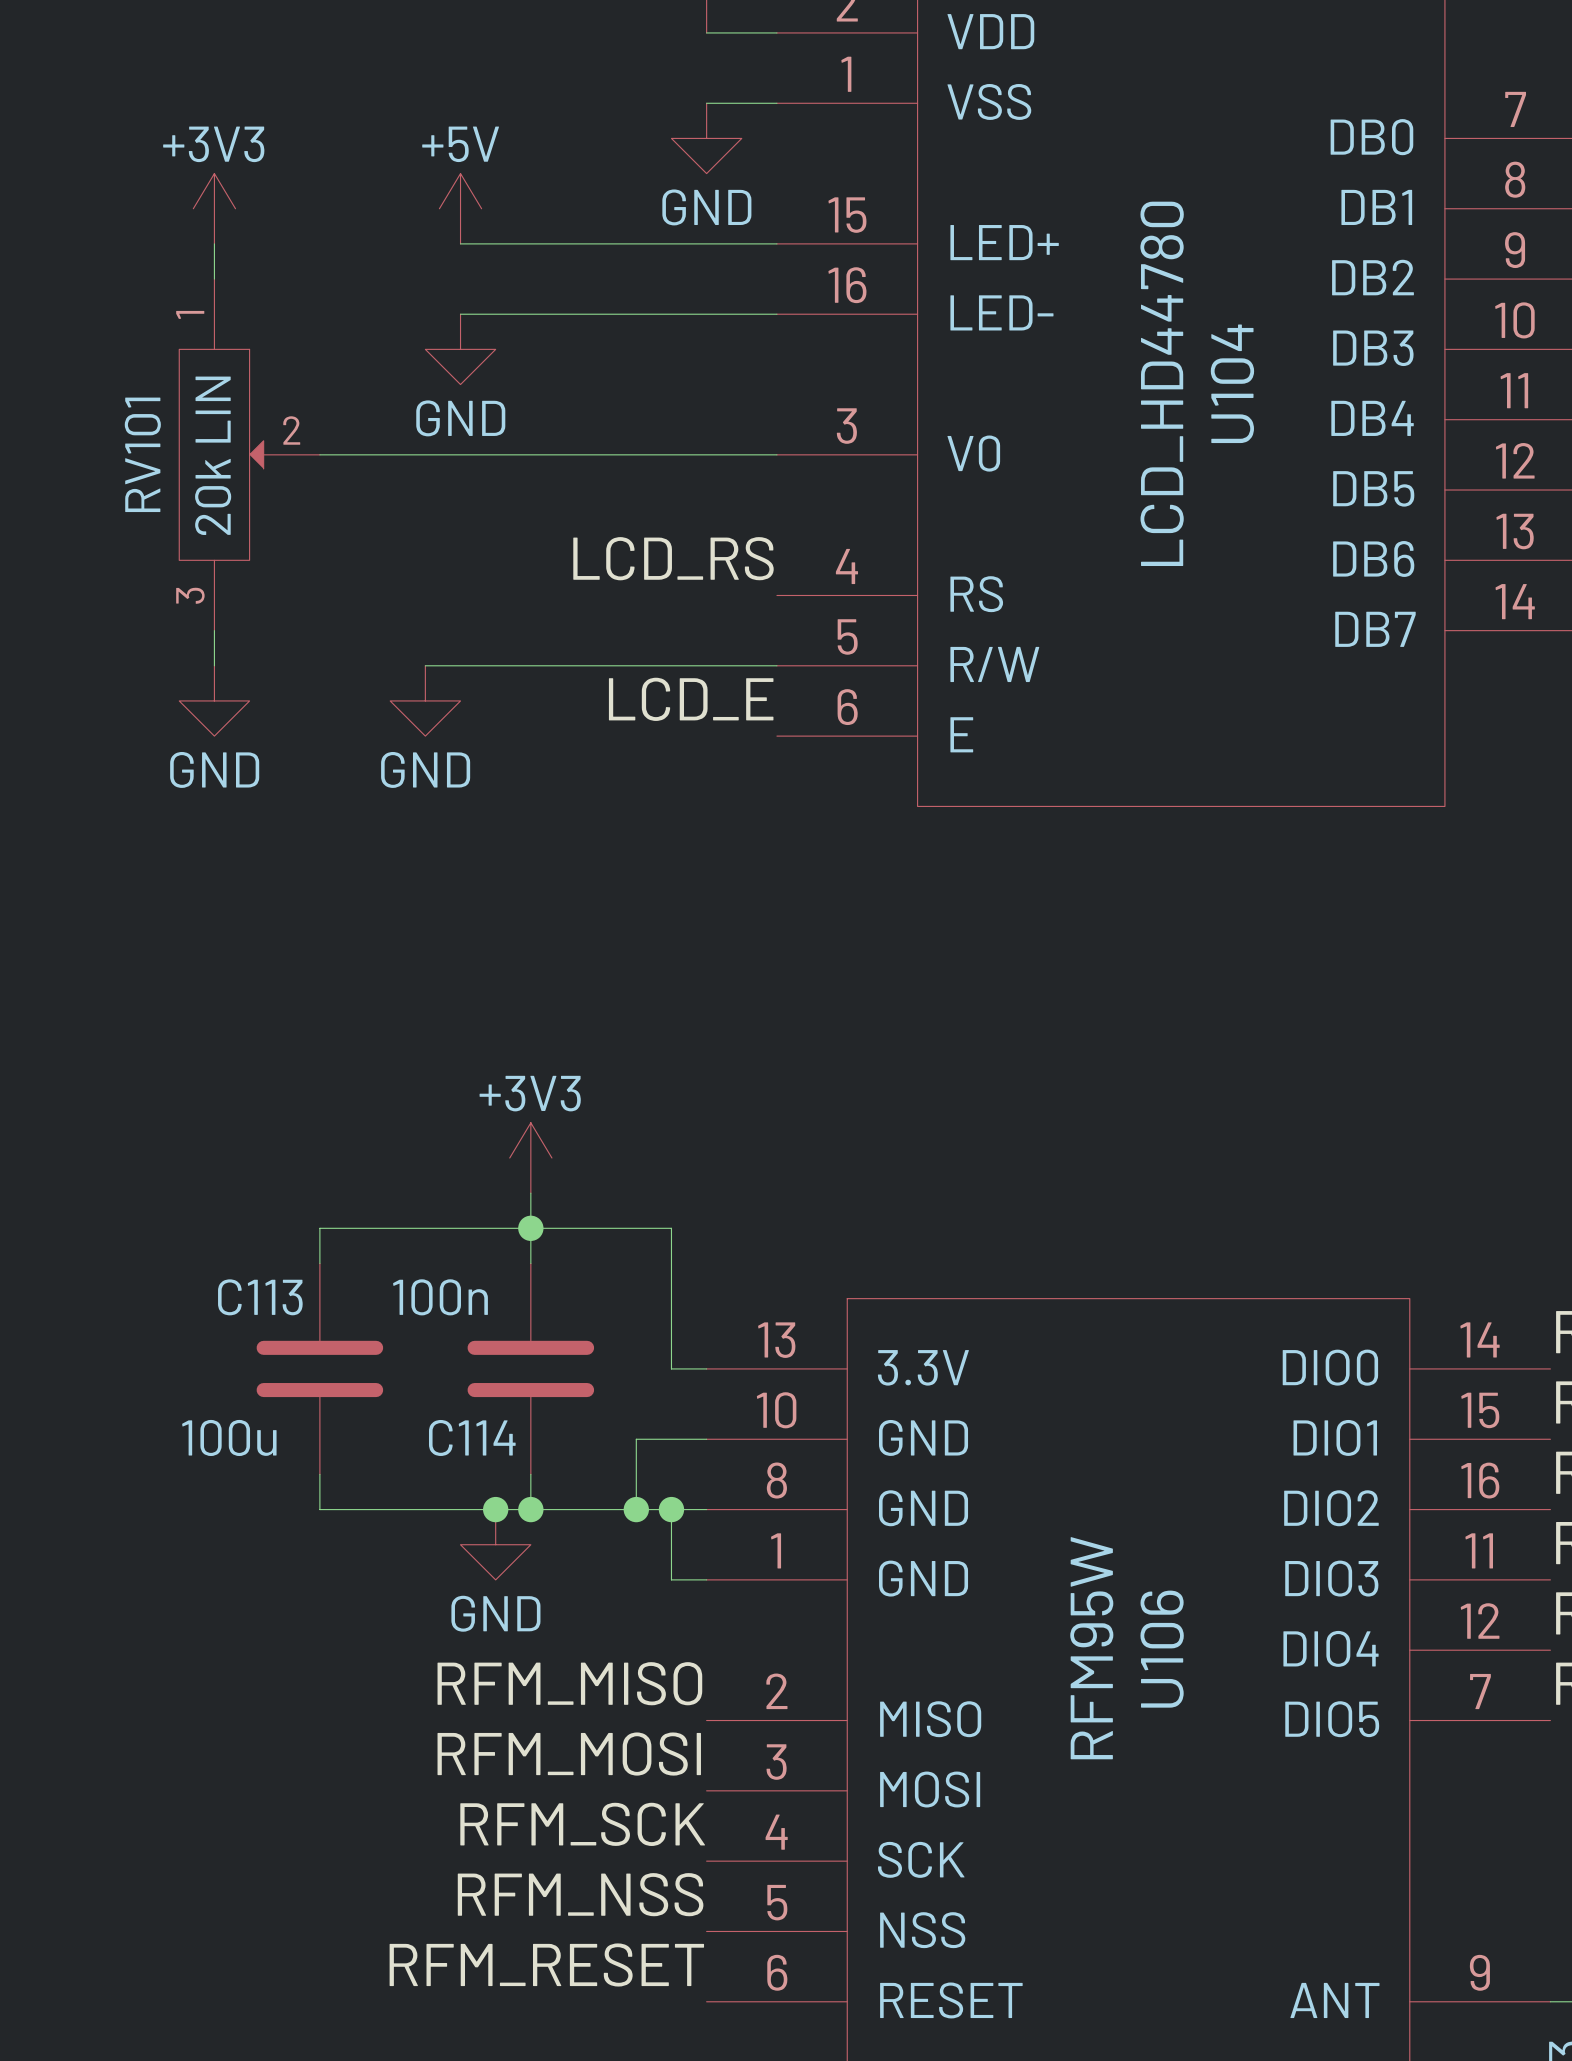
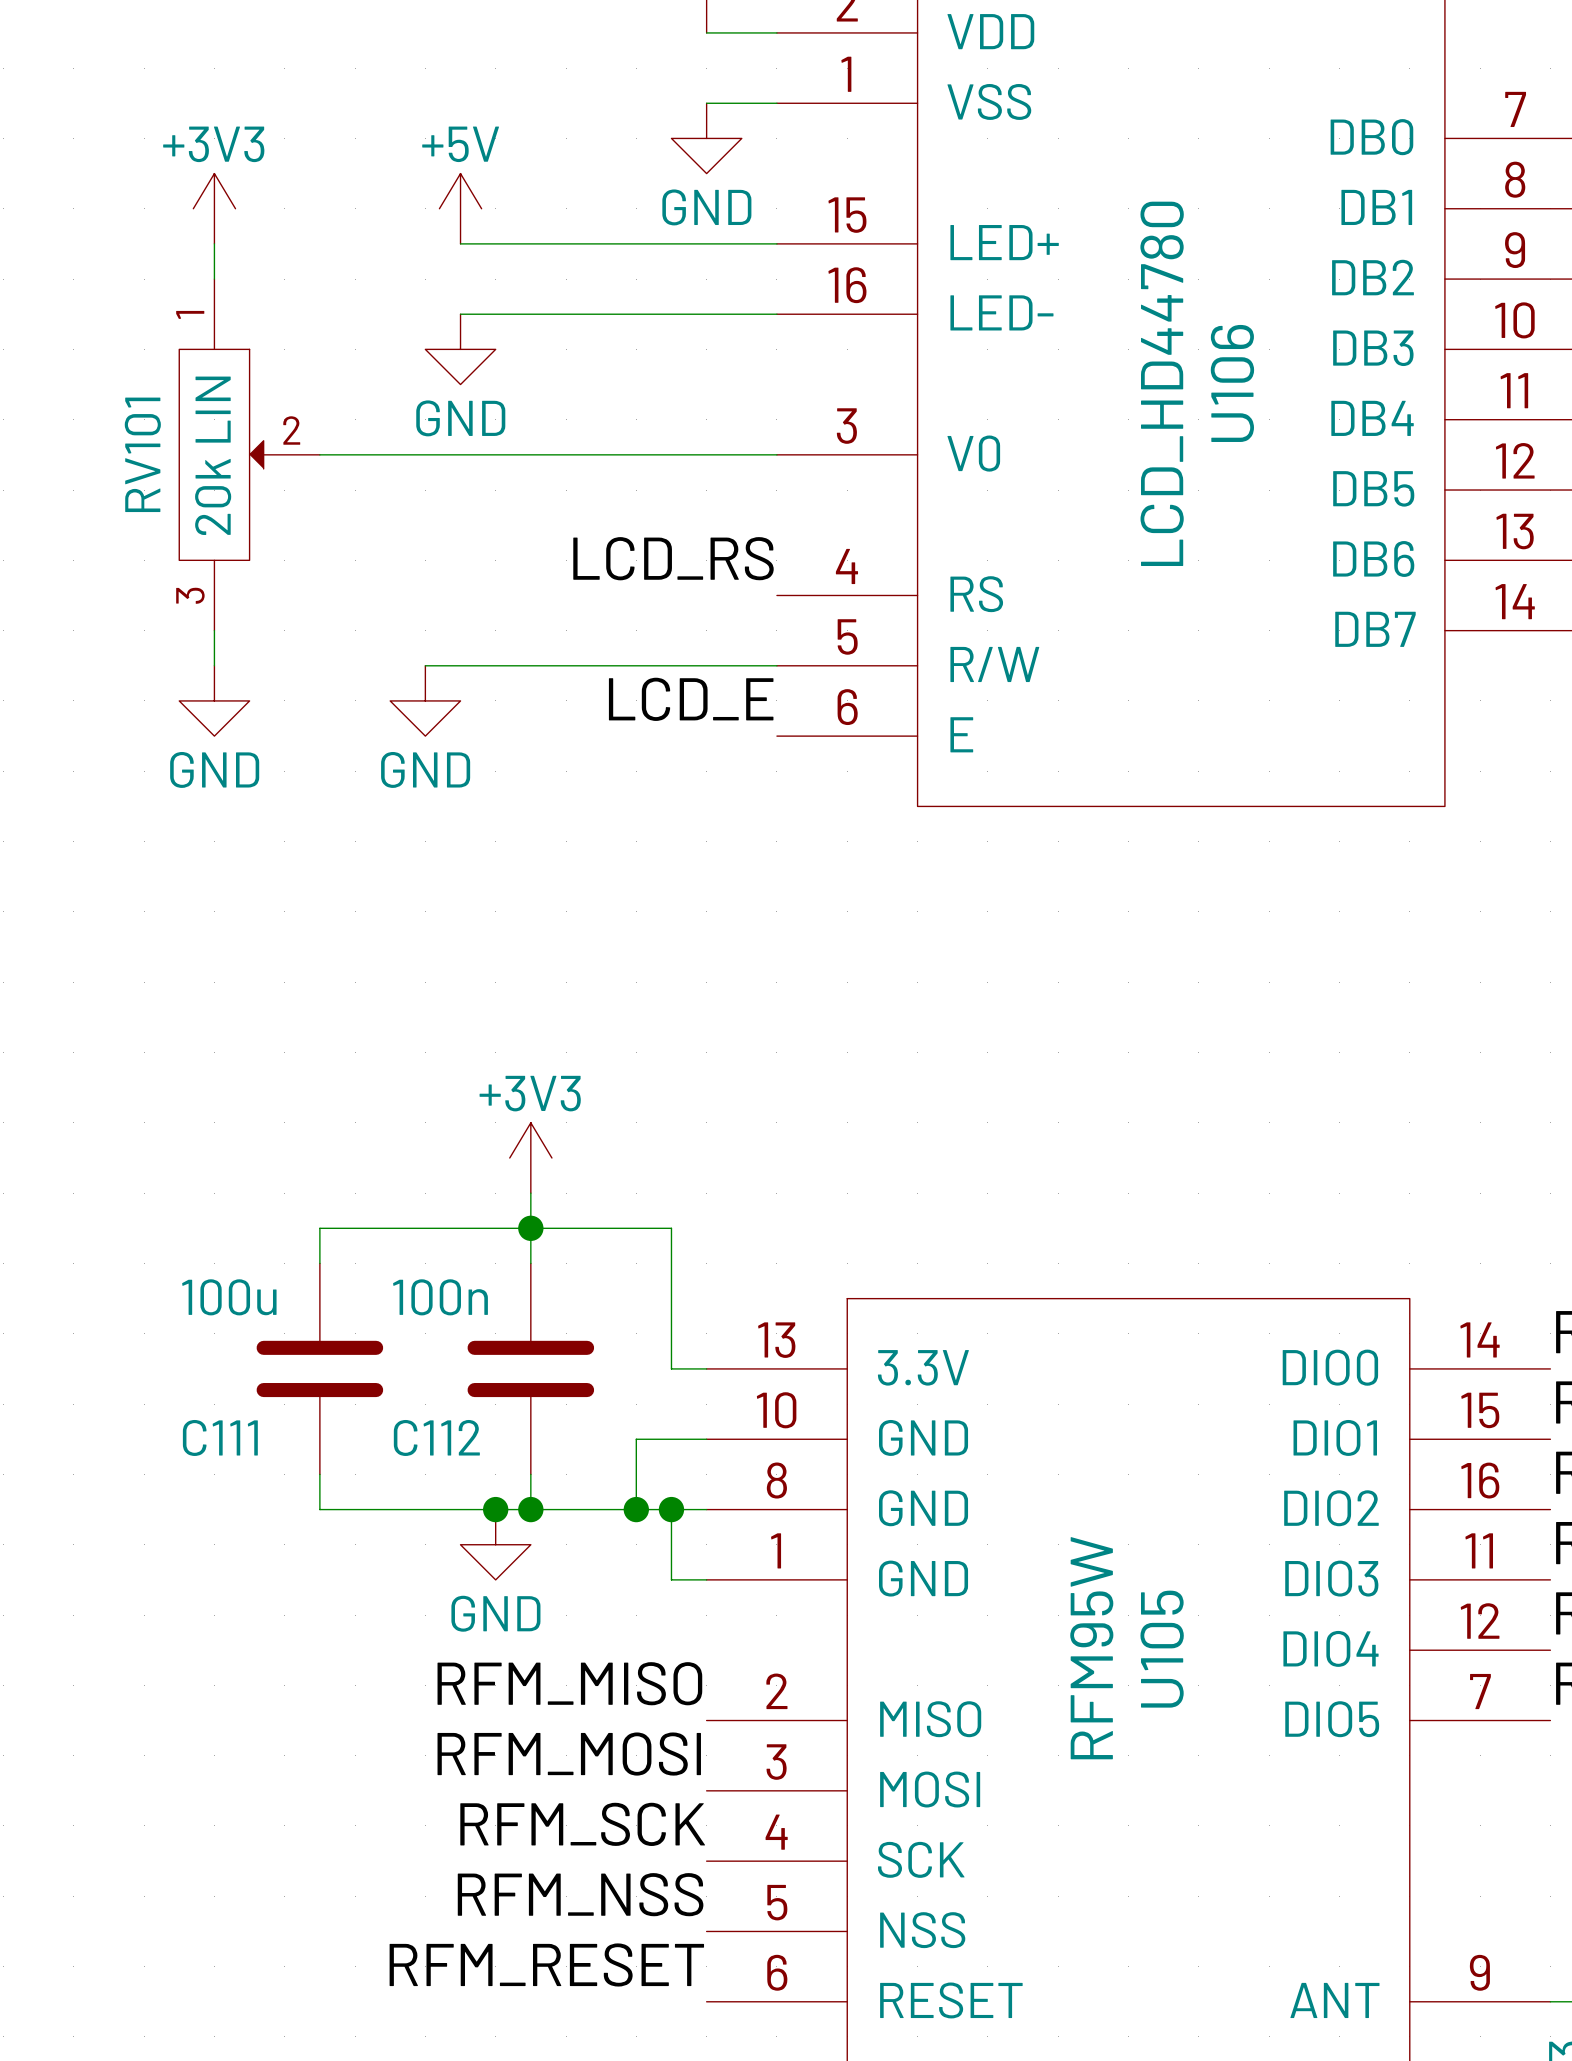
U104 name: U104 (1232, 383) -> U106 (1232, 383)
C113 name: C113 (260, 1297) -> C111 (220, 1437)
C113 value position: 100u (229, 1437) -> 100u (229, 1297)
C114 name: C114 (472, 1437) -> C112 (436, 1437)
U106 name: U106 (1162, 1649) -> U105 (1162, 1649)

